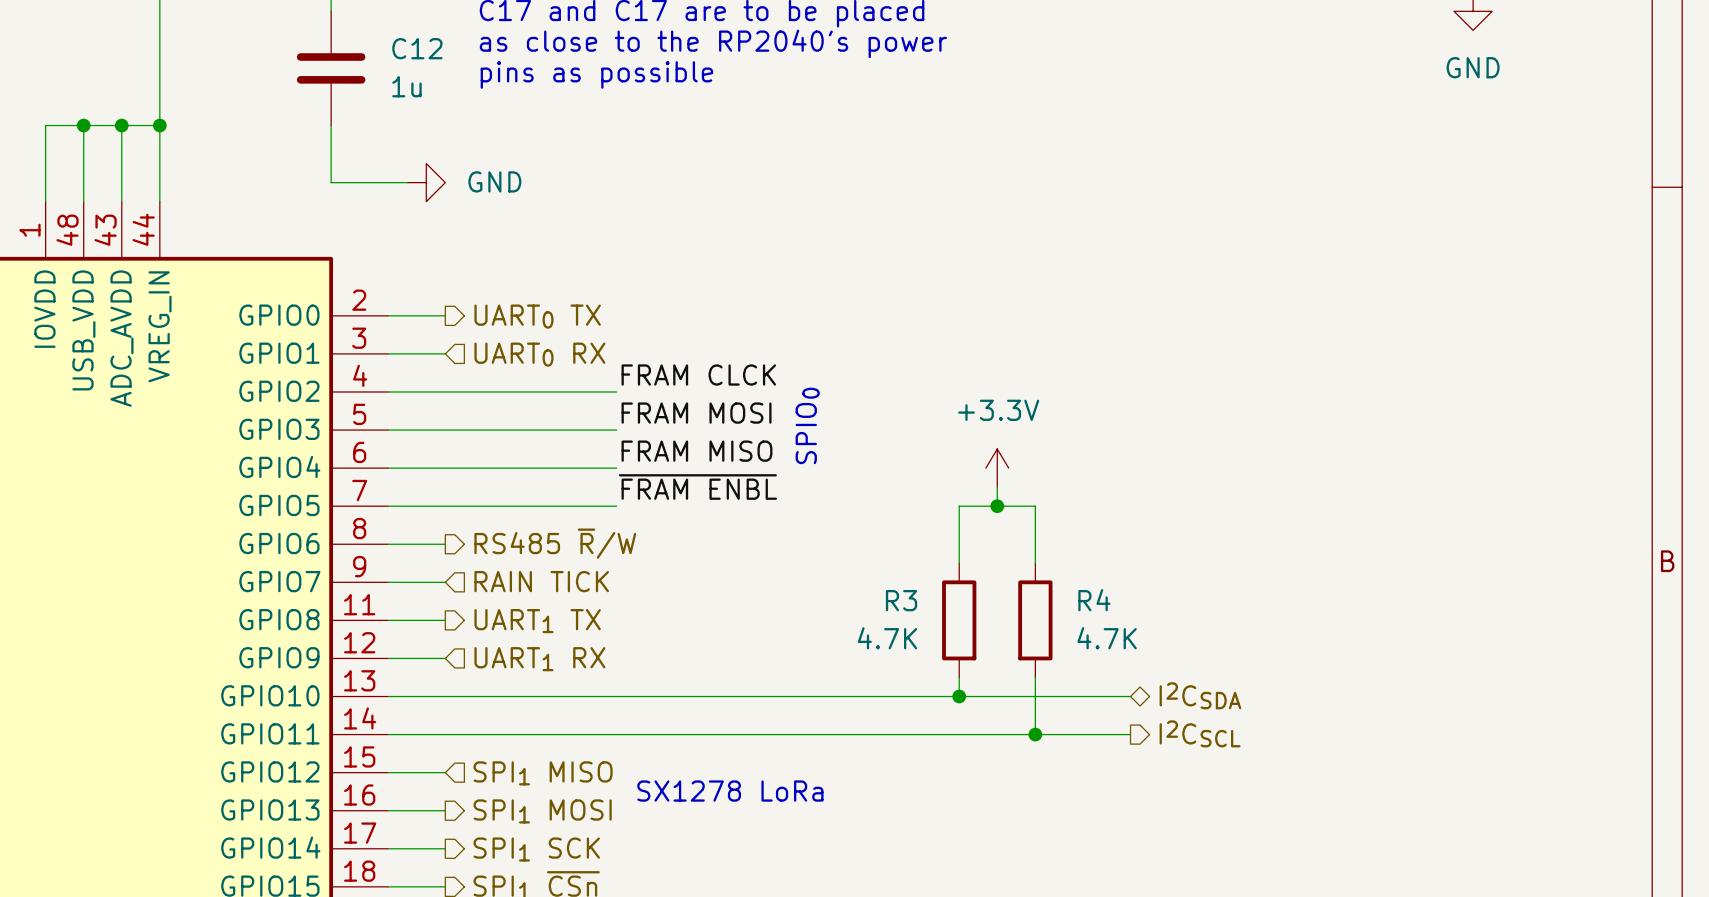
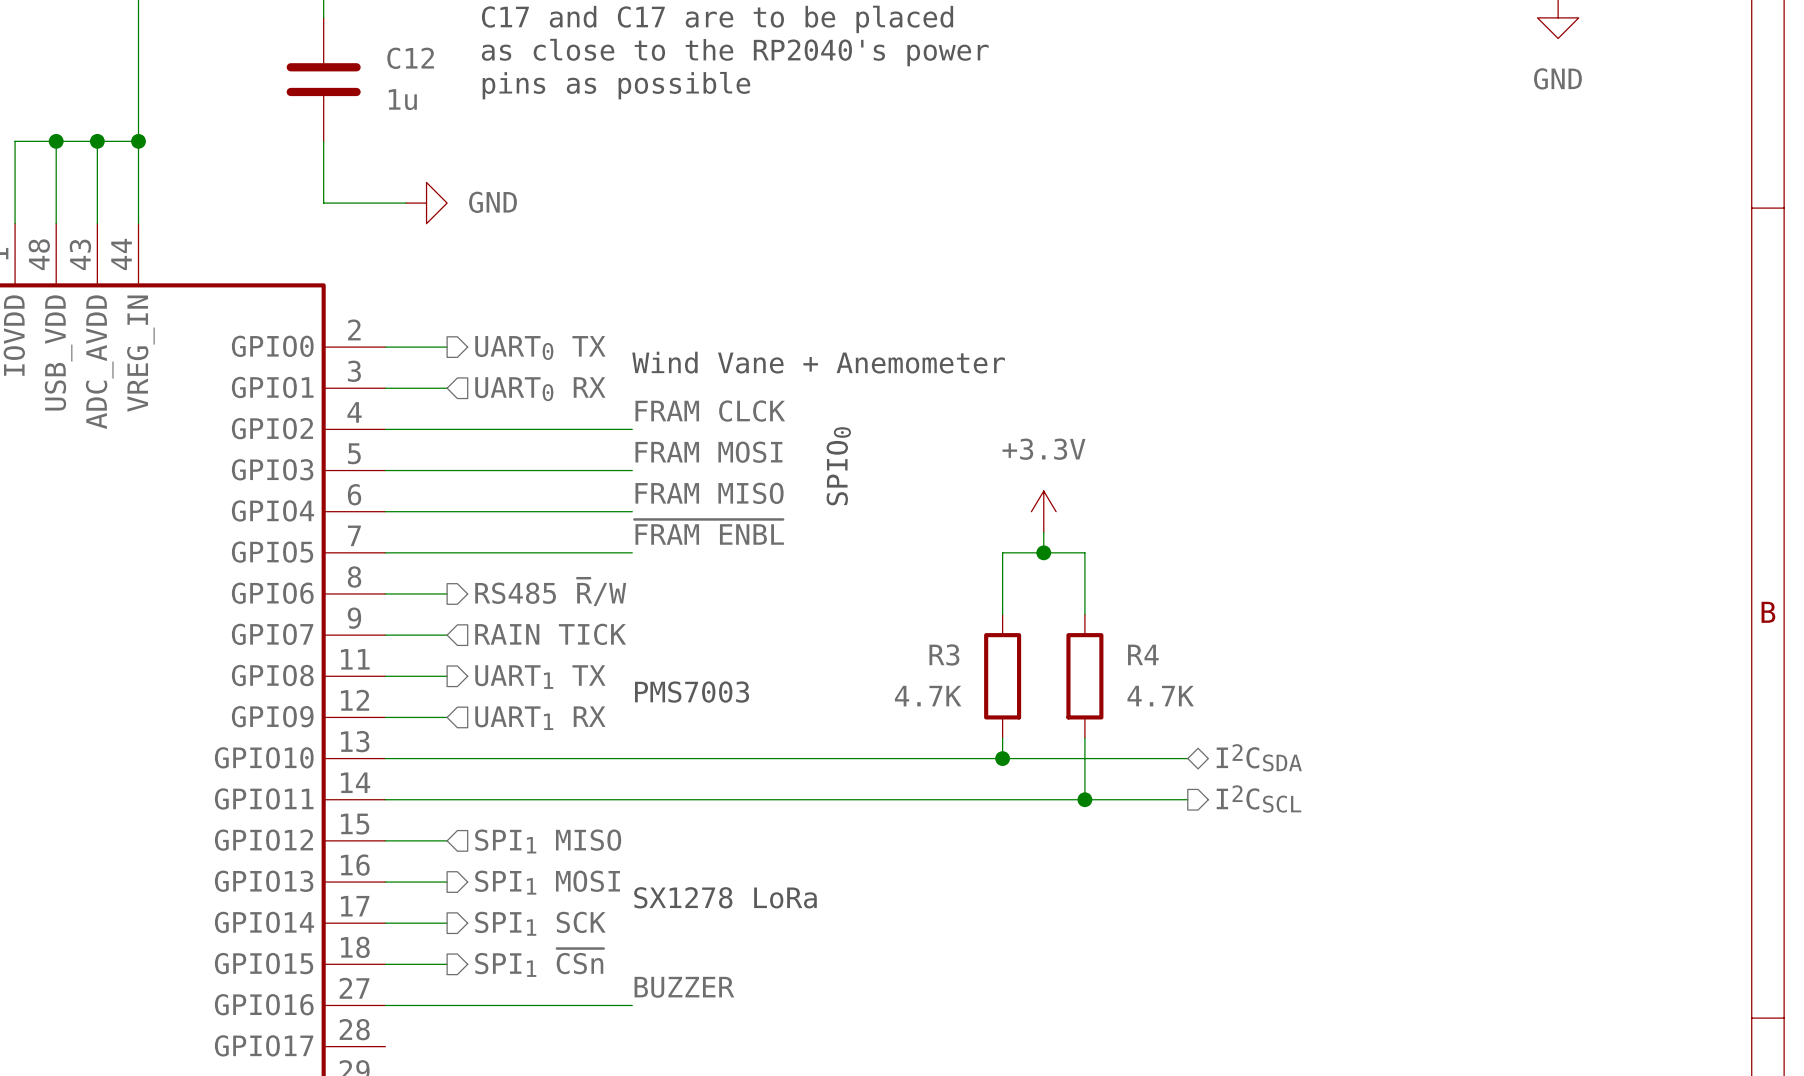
text: none -> Wind Vane + Anemometer (818, 362)
text: none -> PMS7003 (692, 692)
text position: SX1278 LoRa (730, 791) -> SX1278 LoRa (725, 897)

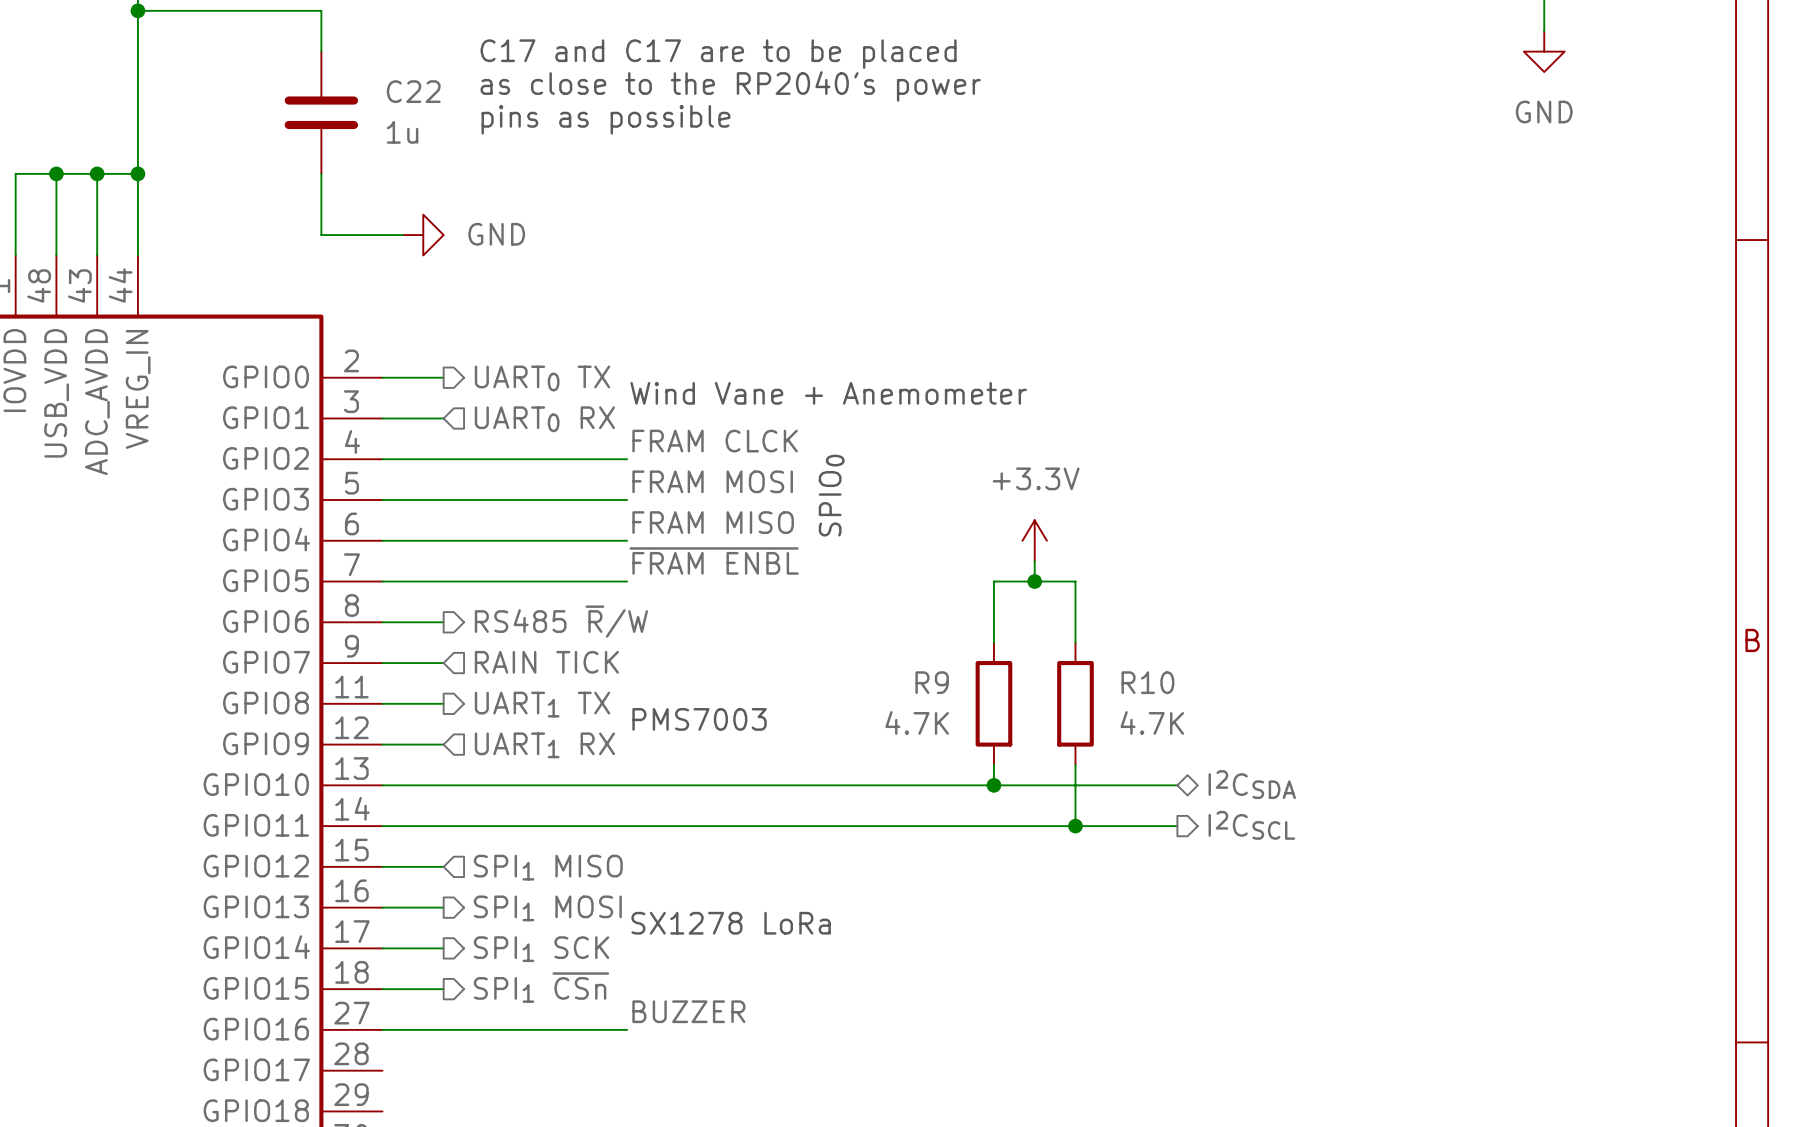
C12 name: C12 (410, 58) -> C22 (413, 91)
R3 name: R3 (944, 654) -> R9 (932, 682)
R4 name: R4 (1143, 654) -> R10 (1147, 682)

